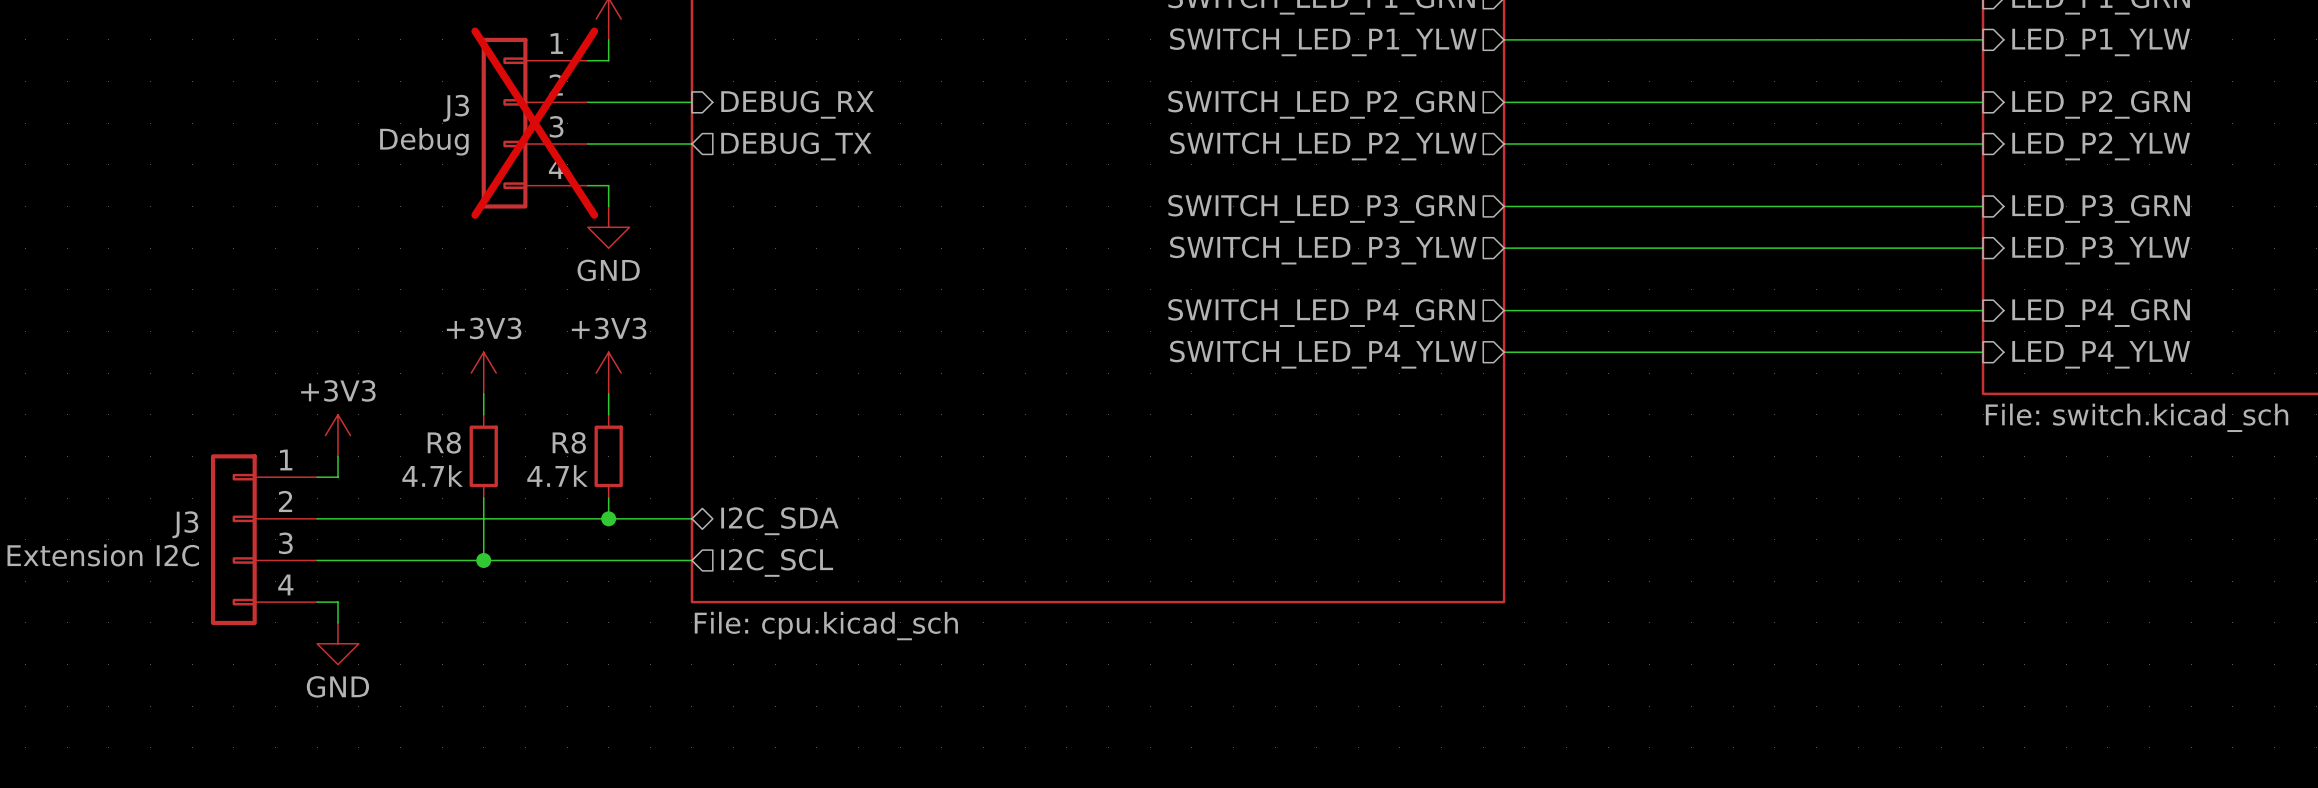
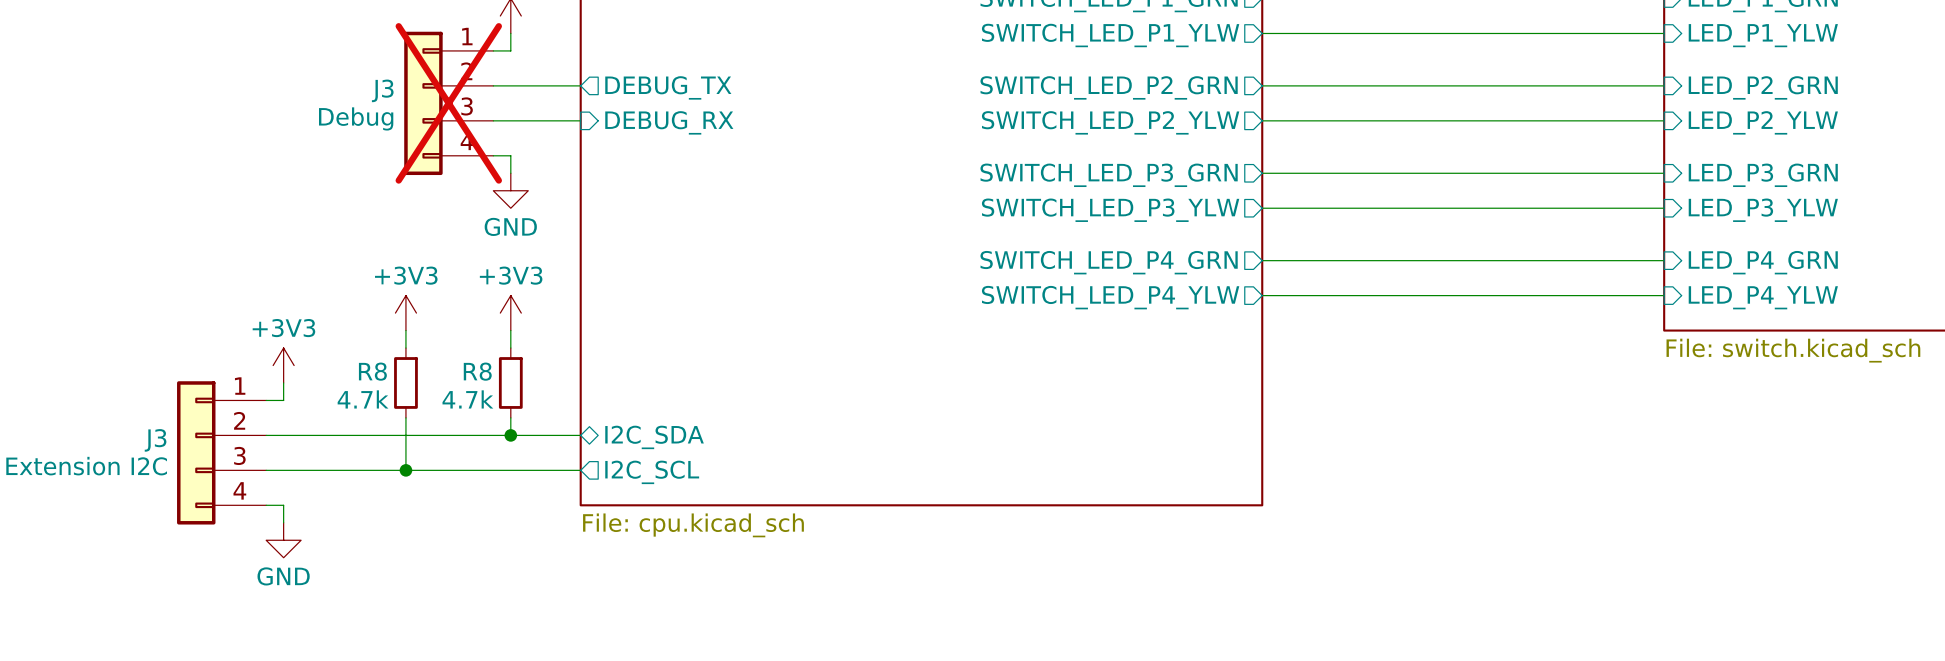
sheet pin shape: input (797, 104) -> output (668, 87)
sheet pin: DEBUG_RX (797, 104) -> DEBUG_TX (668, 87)
sheet pin shape: output (796, 146) -> input (669, 122)
sheet pin: DEBUG_TX (796, 146) -> DEBUG_RX (669, 122)

